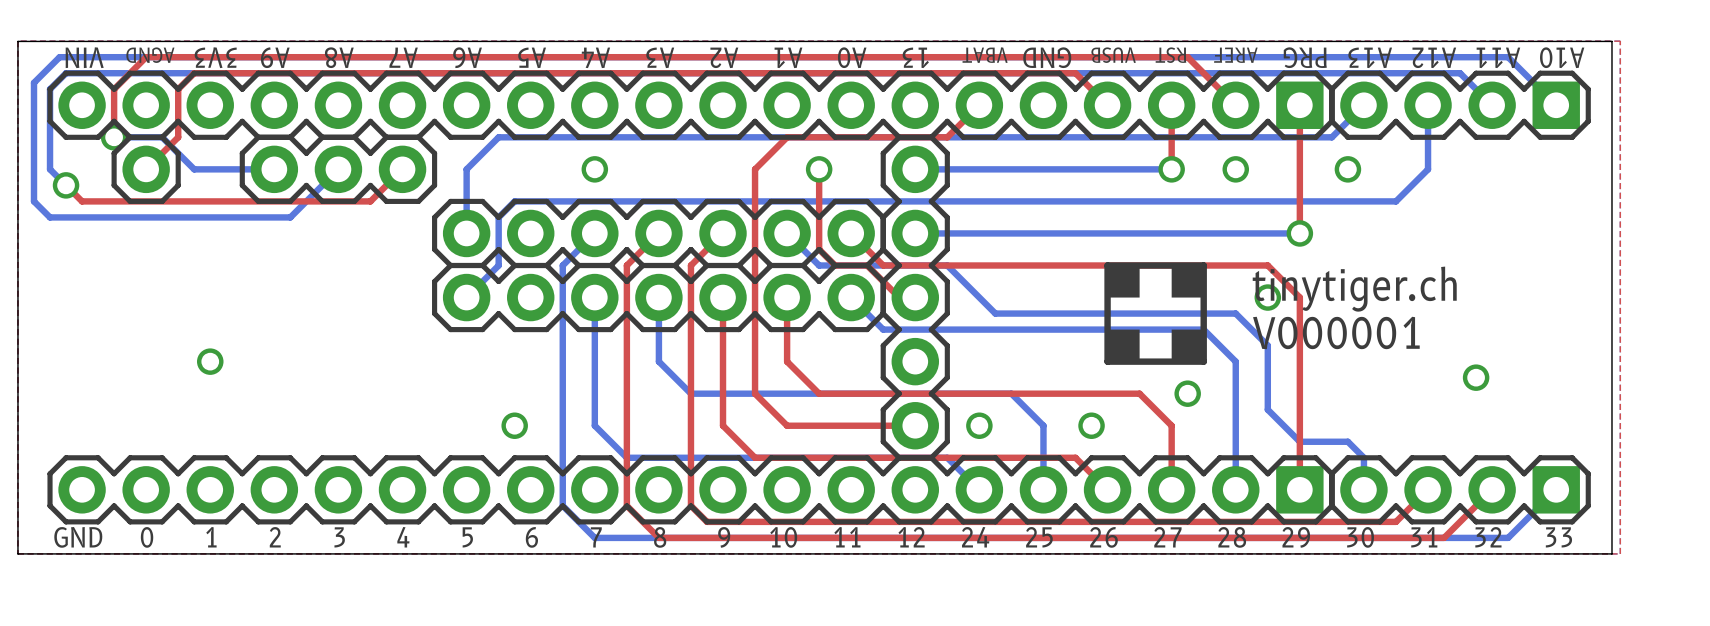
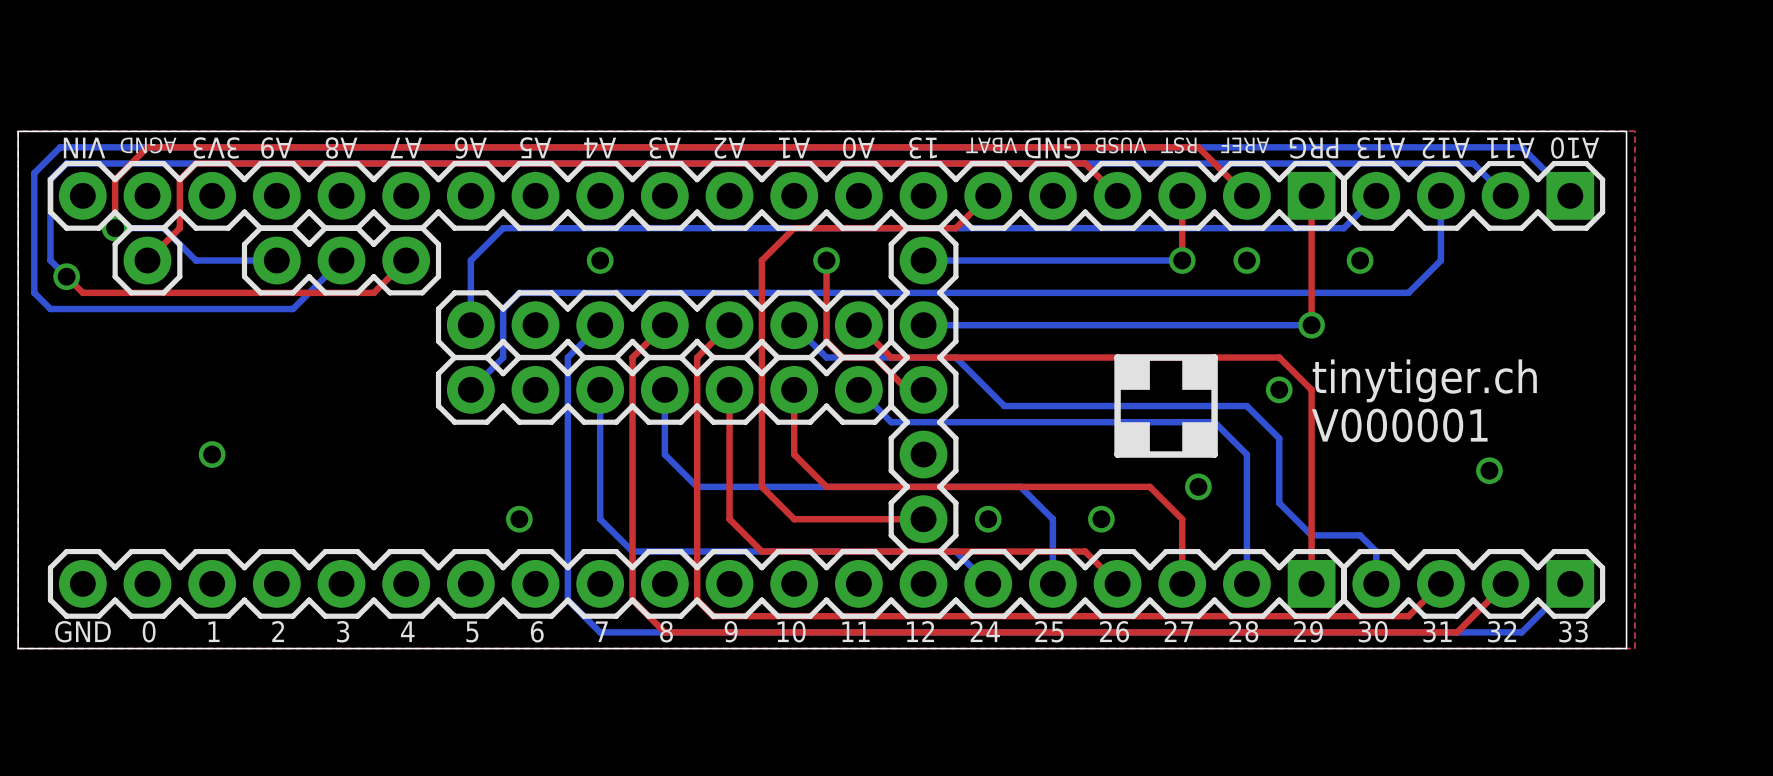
text position: tinytiger.ch (1354, 289) -> tinytiger.ch (1424, 380)
text position: V000001 (1336, 333) -> V000001 (1399, 425)

